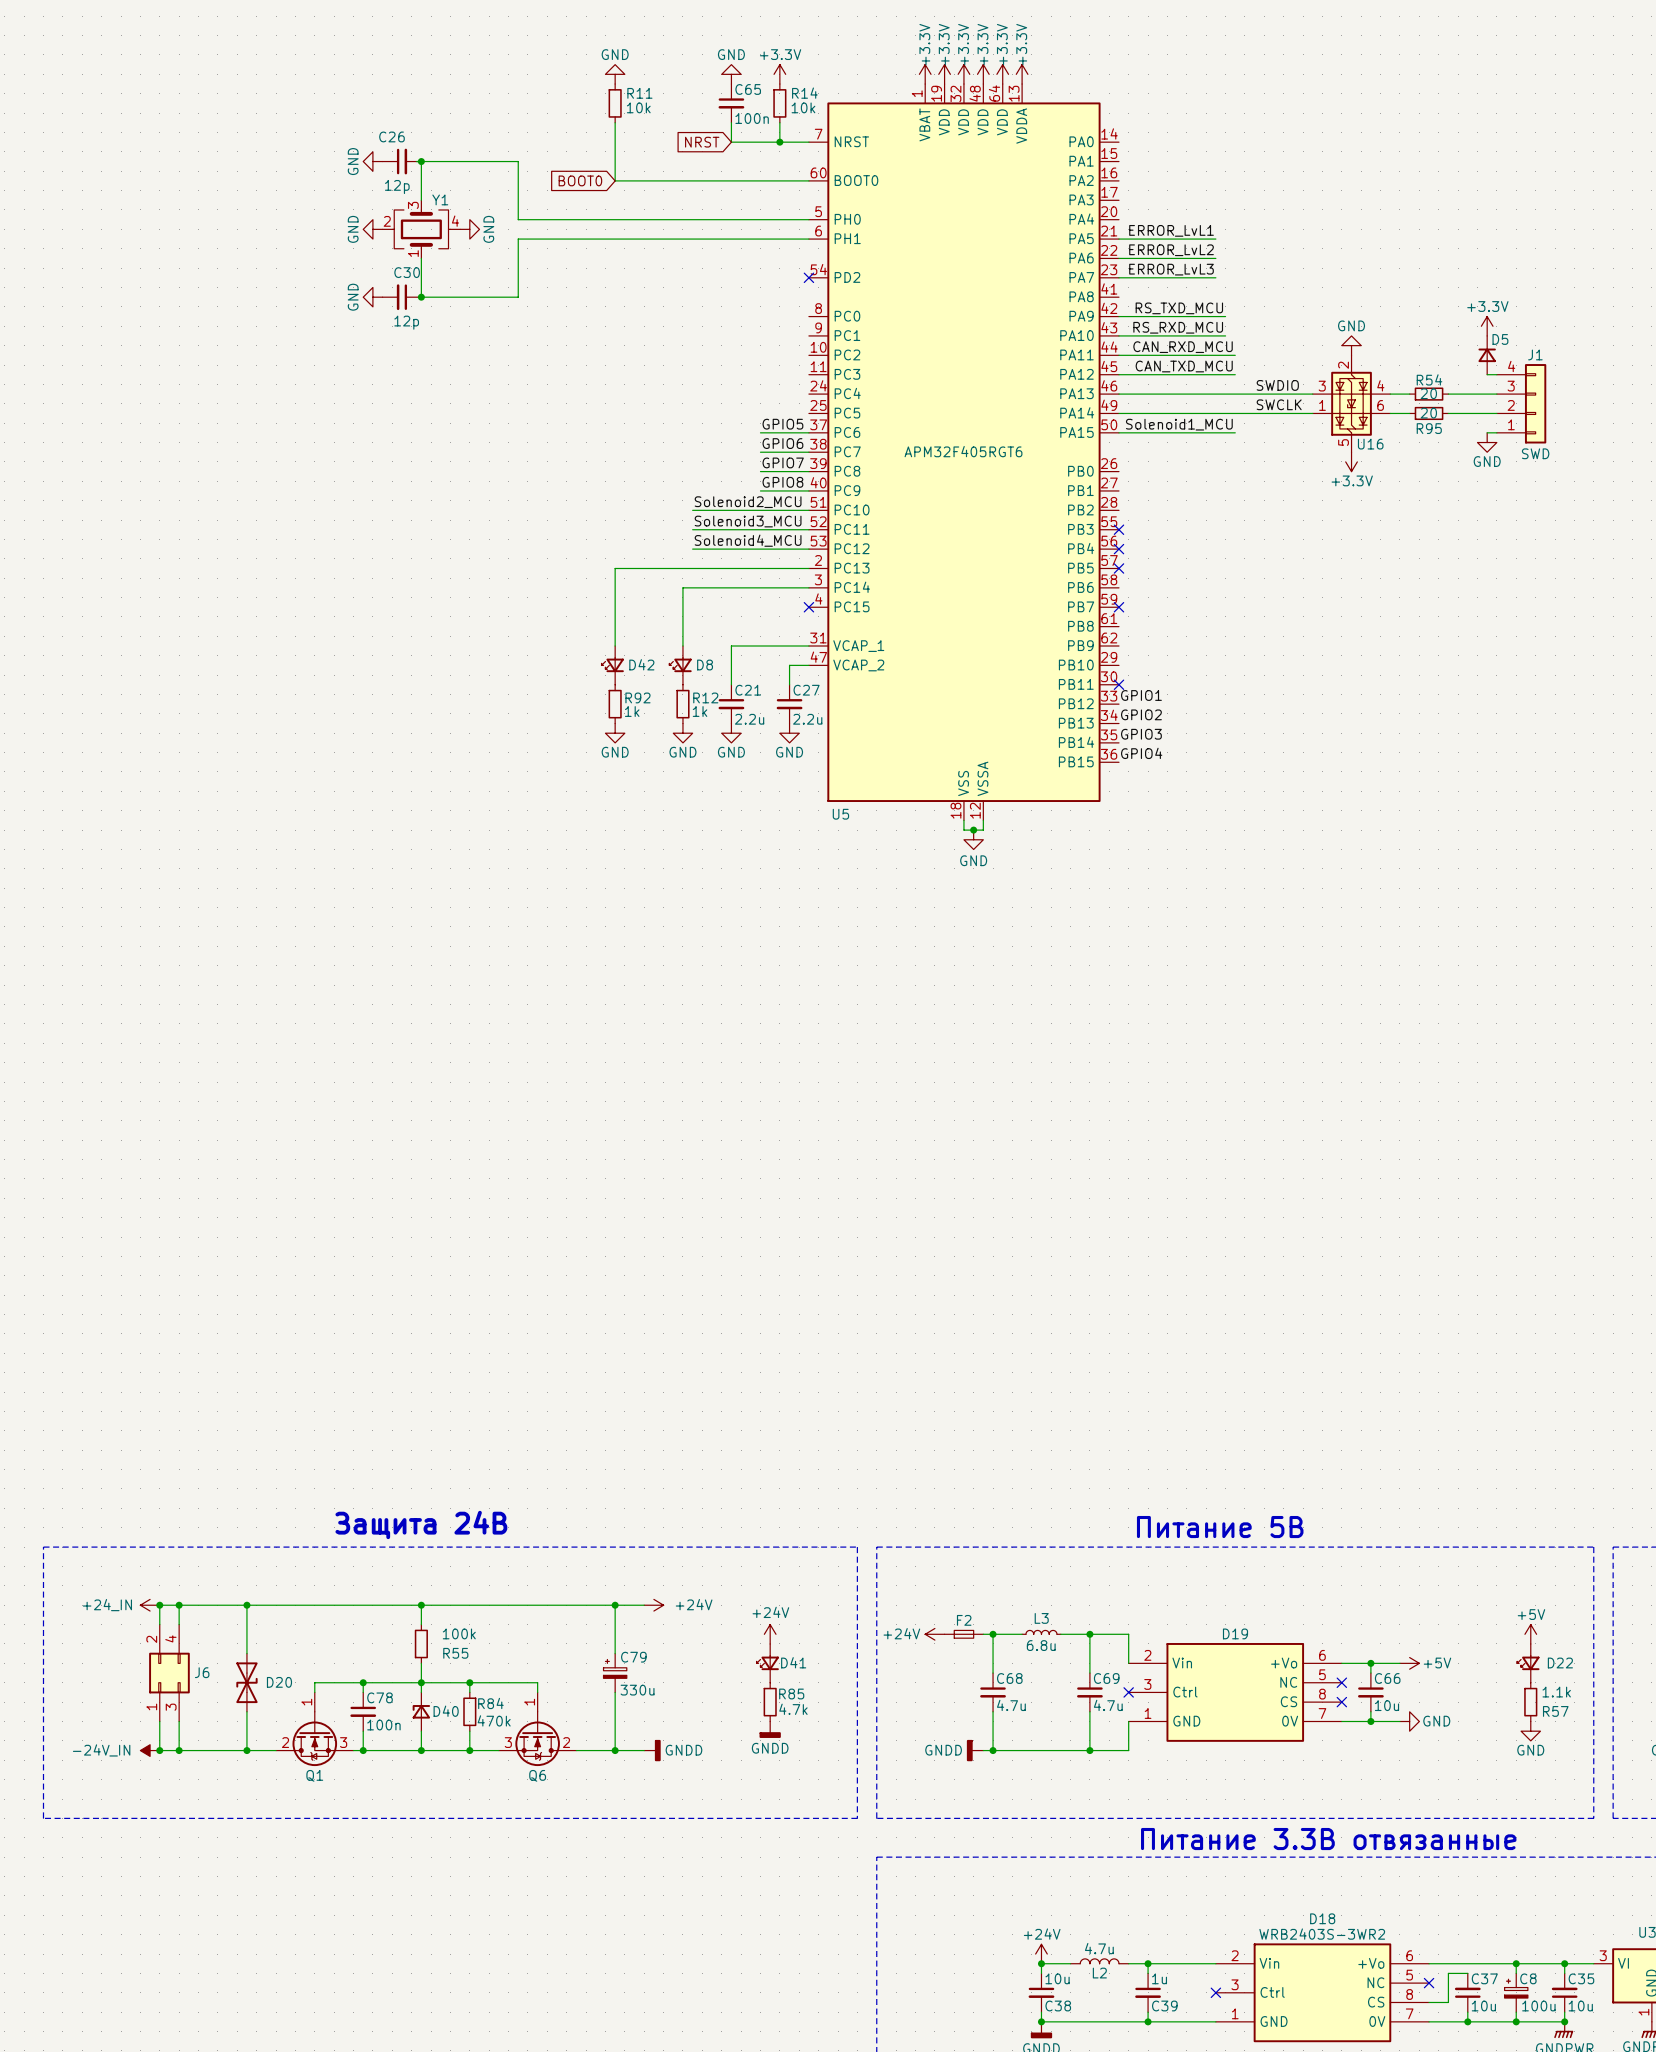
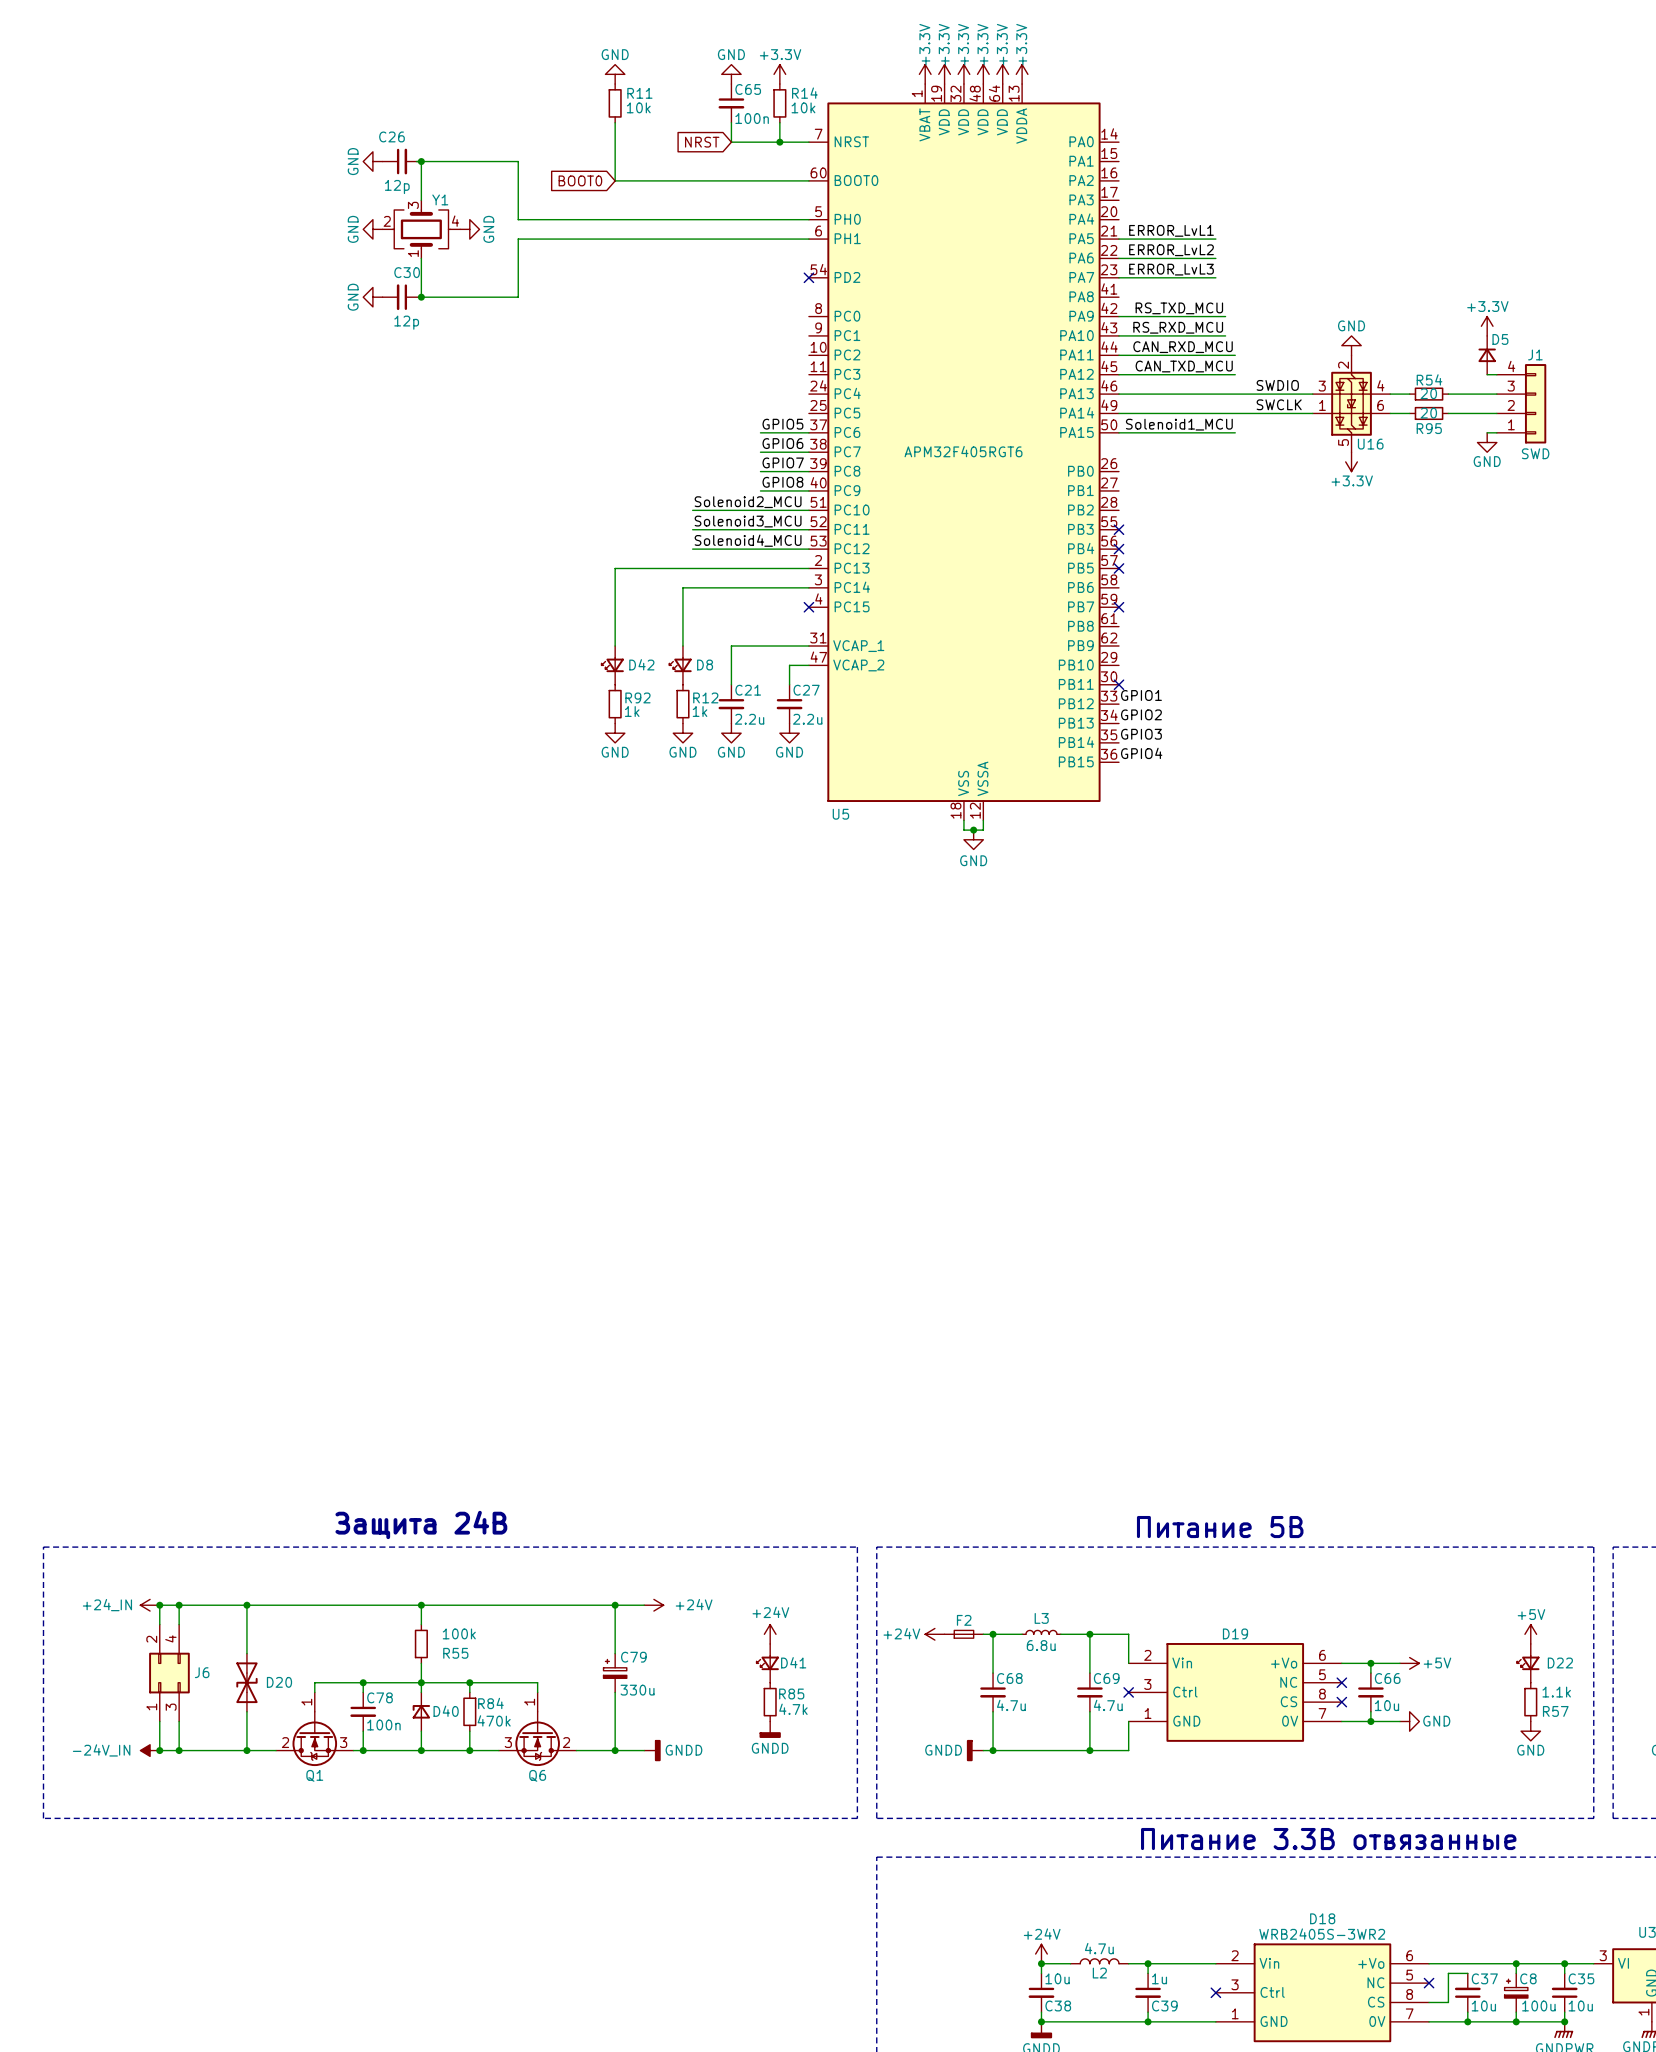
D18 text: WRB2403S-3WR2 (1322, 1934) -> WRB2405S-3WR2 (1322, 1934)

